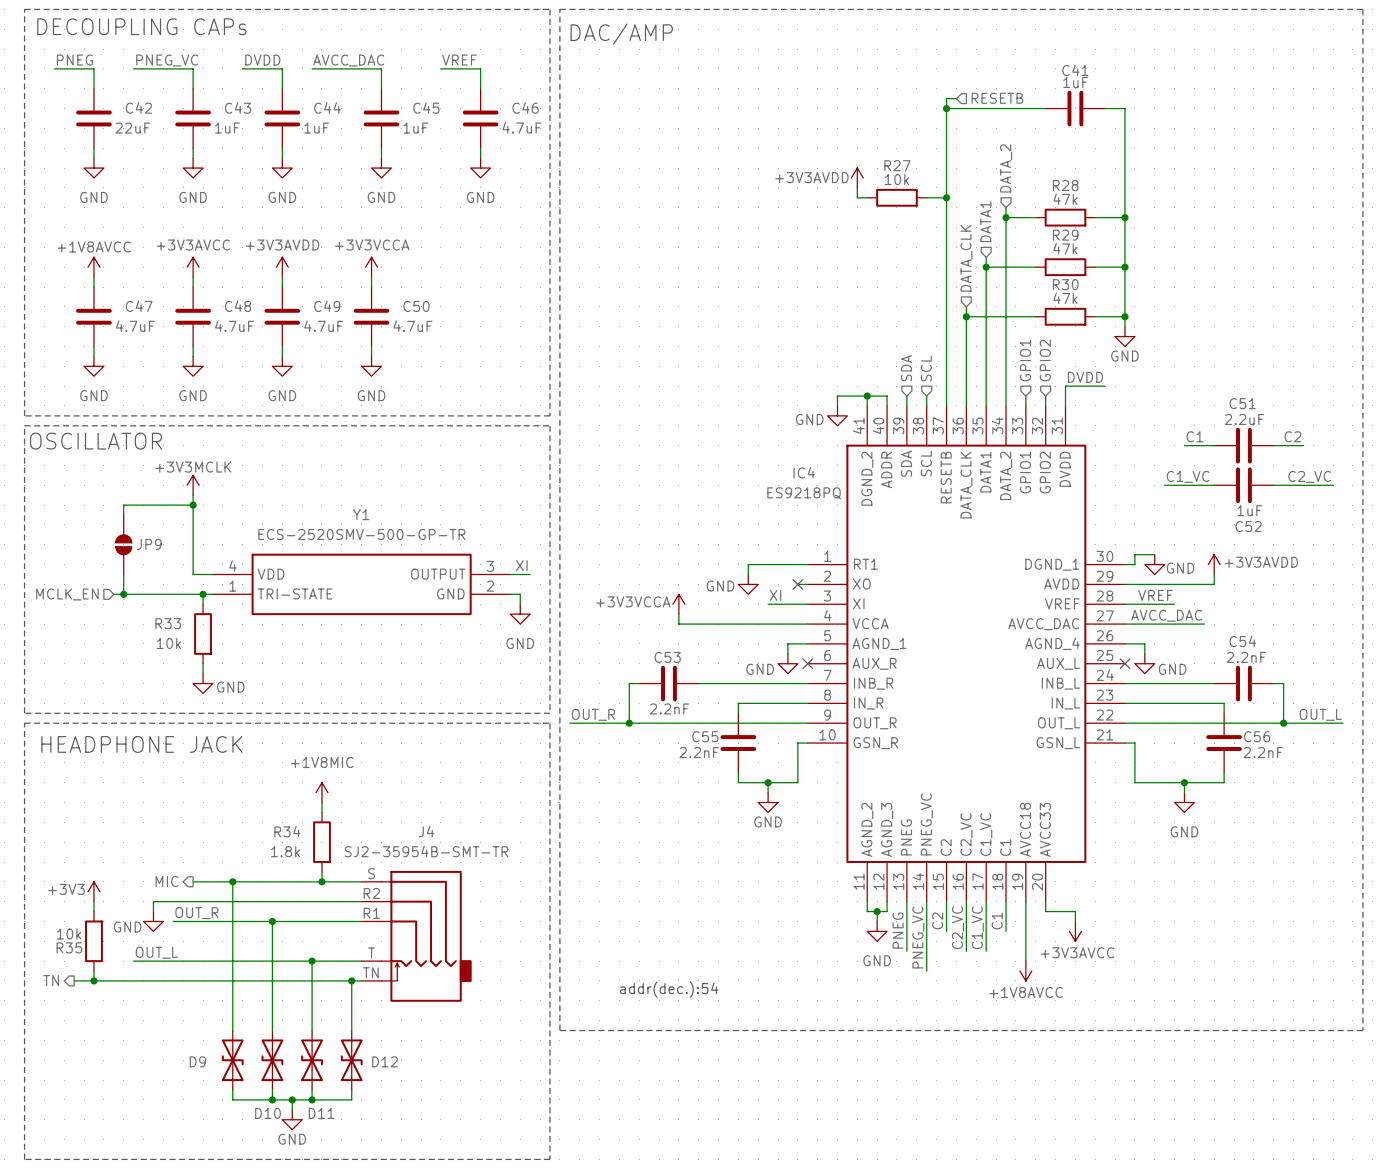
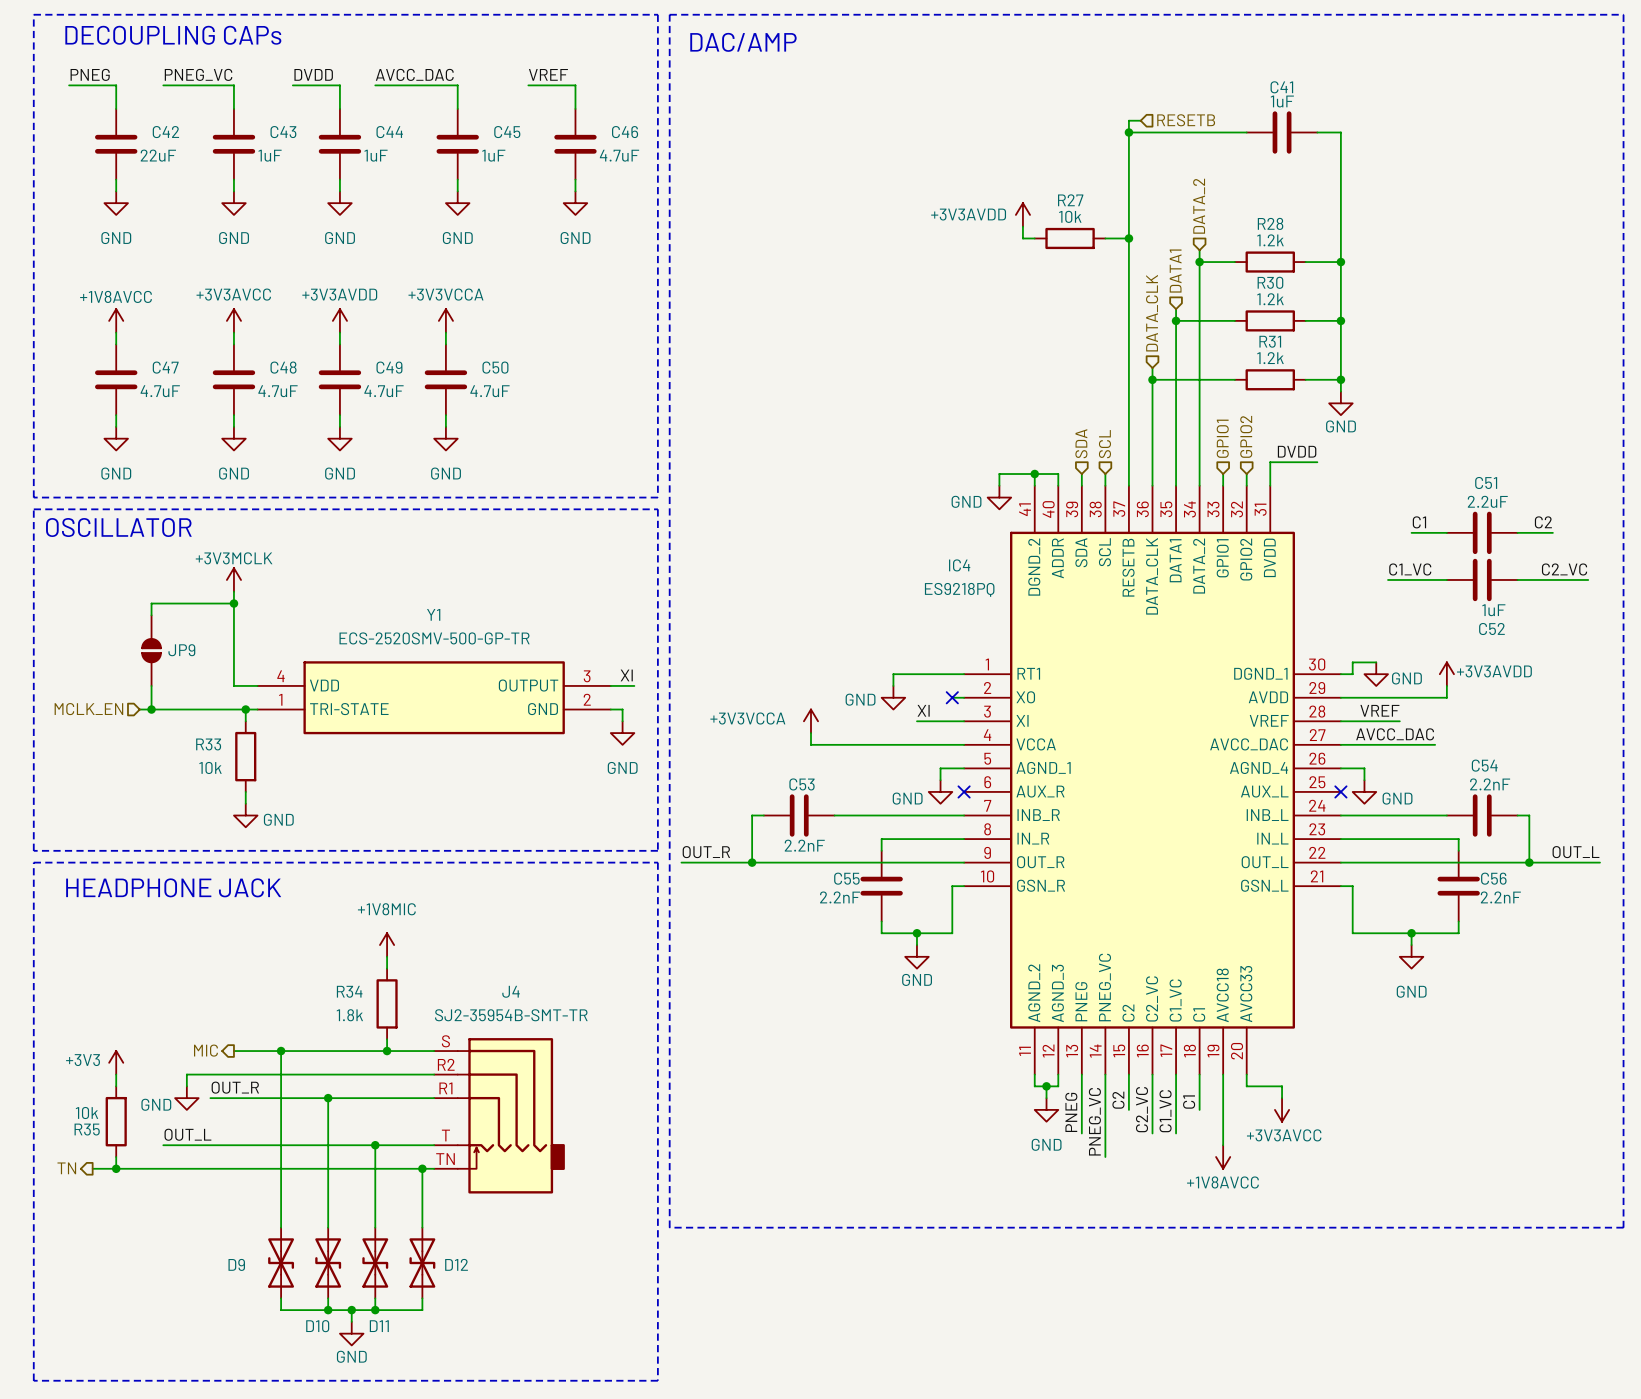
R28 value: 47k (1065, 199) -> 1.2k (1270, 240)
R29 name: R29 (1065, 235) -> R30 (1270, 282)
R29 value: 47k (1065, 248) -> 1.2k (1270, 299)
R30 name: R30 (1065, 284) -> R31 (1270, 341)
R30 value: 47k (1065, 298) -> 1.2k (1270, 358)
text: addr(dec.):54 (669, 989) -> none

